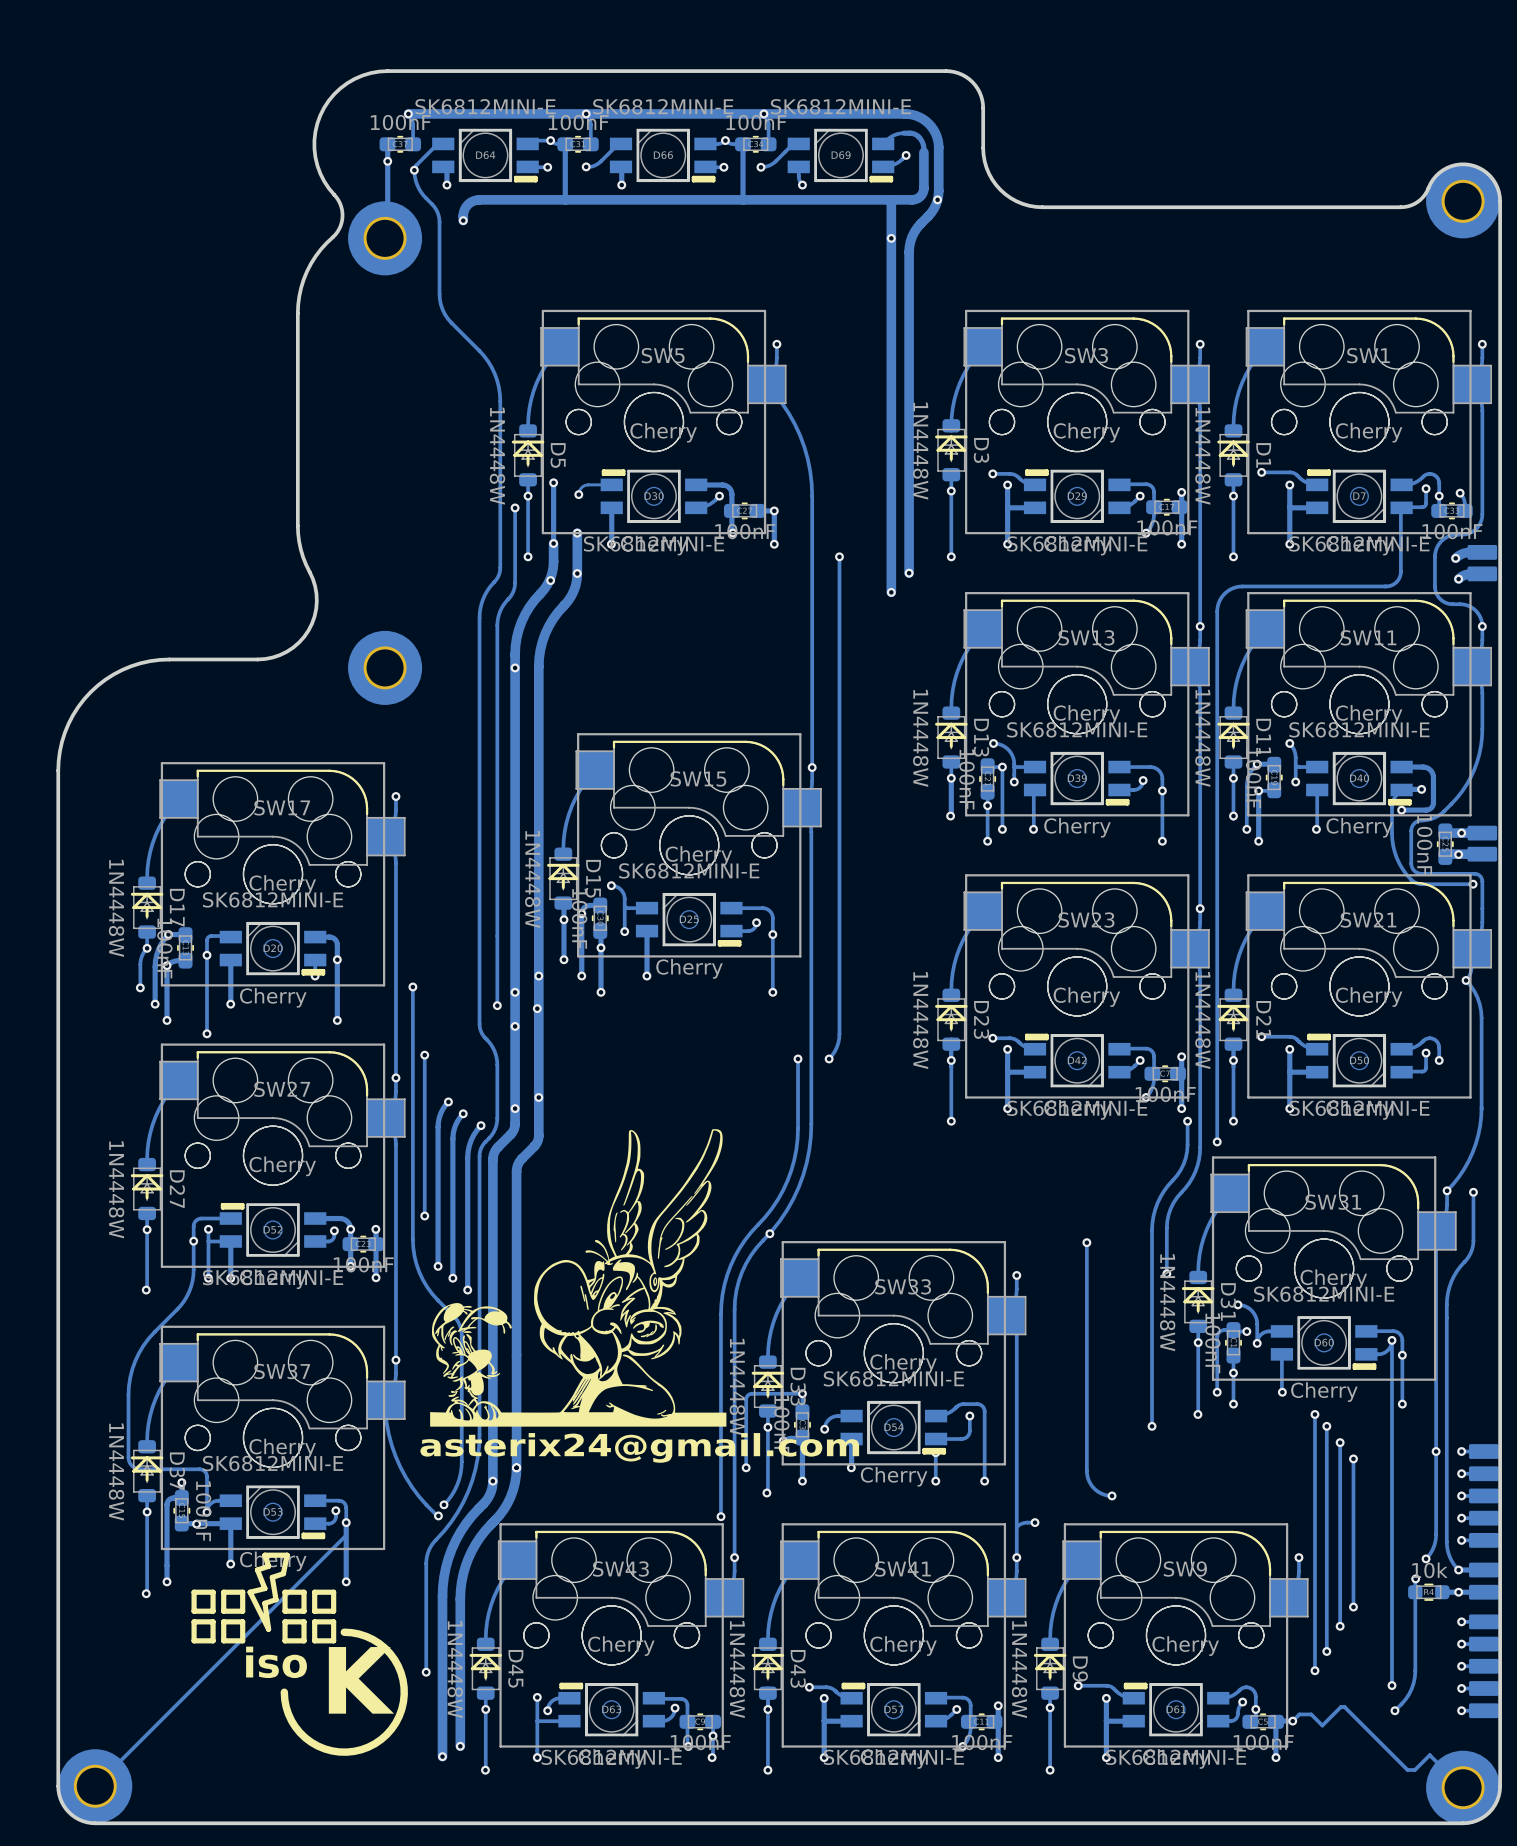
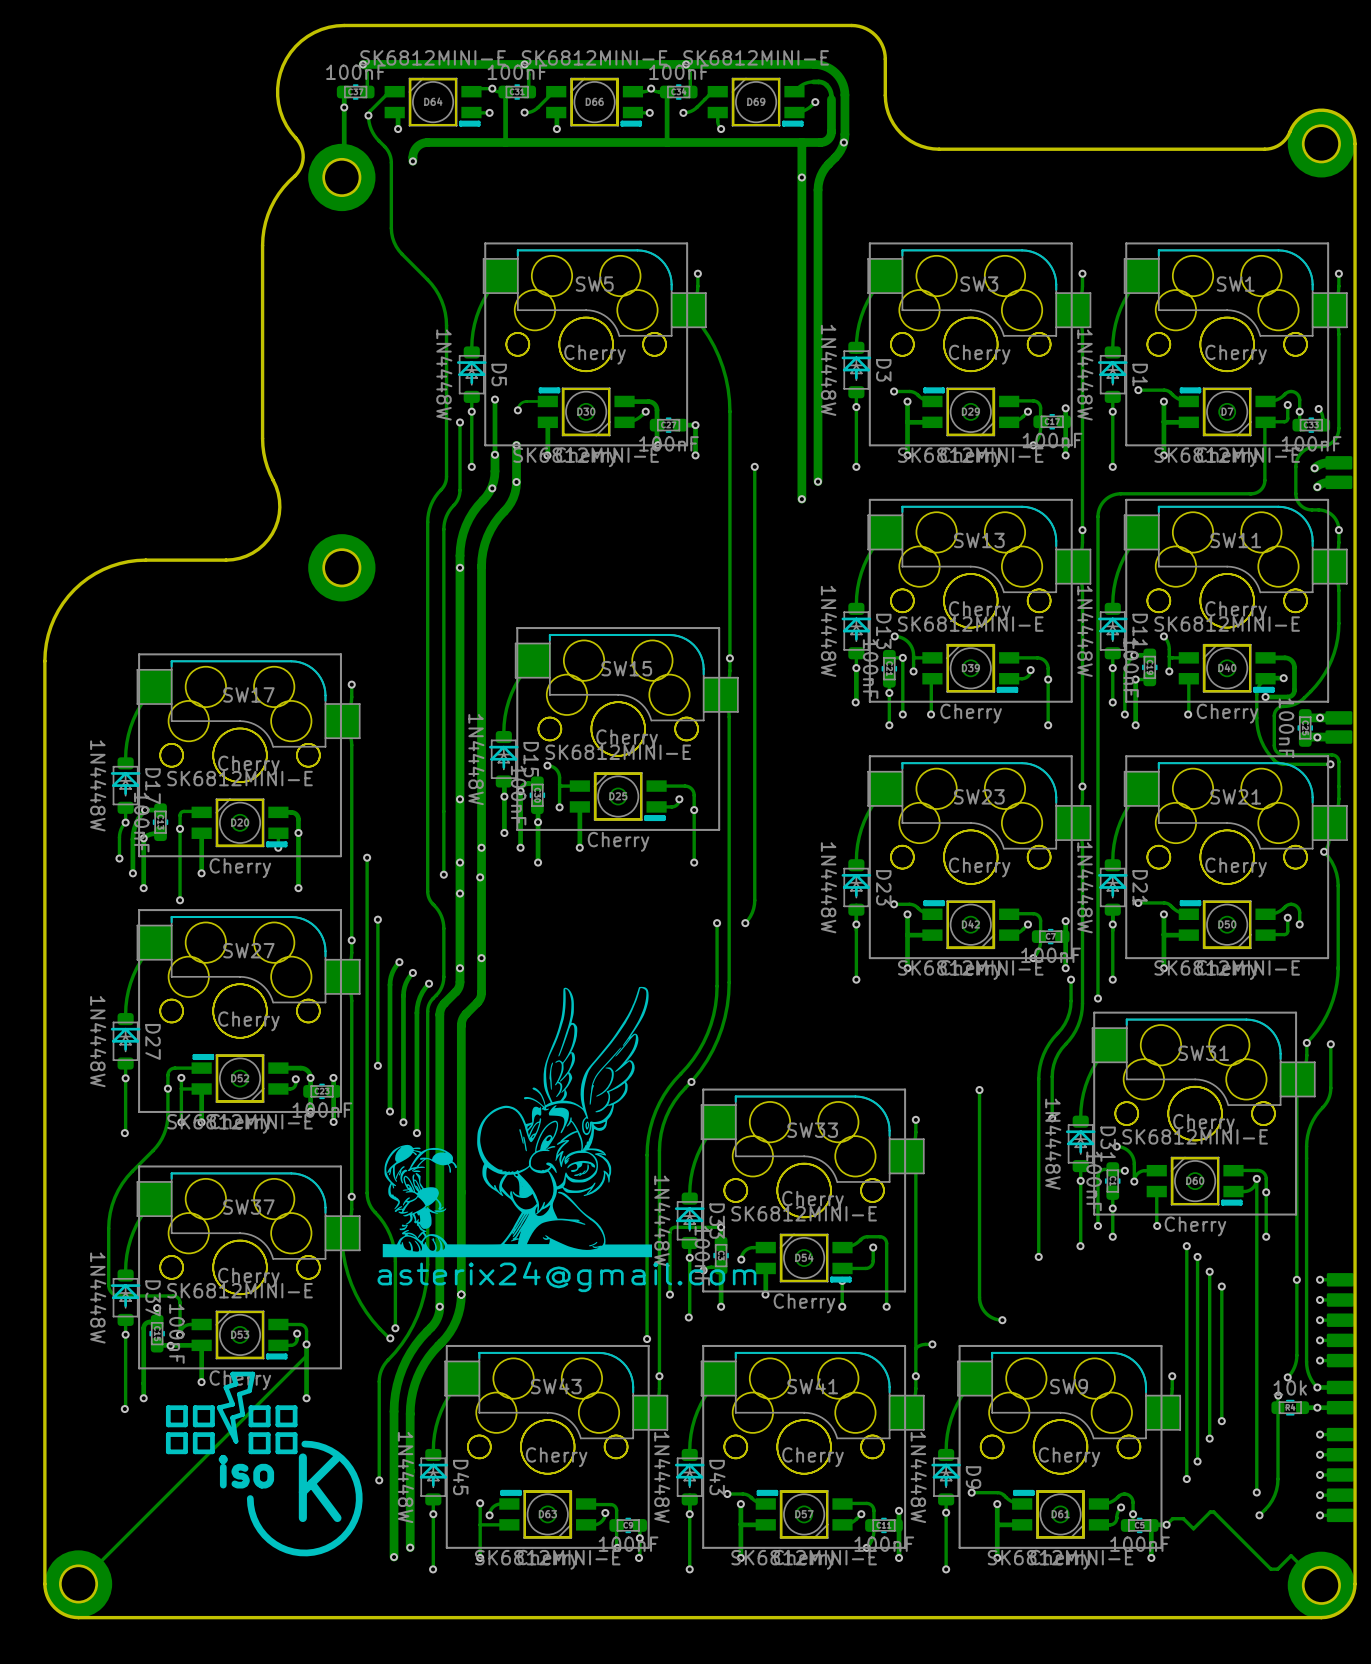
via: none -> (459, 799)
track: (412, 1239) (414, 1256) (423, 1280) (432, 1294) (457, 1320) (461, 1332) (461, 1467) (454, 1490) (444, 1504) -> (367, 1087) (367, 1196) (370, 1206) (387, 1228) (394, 1247) (395, 1328)

